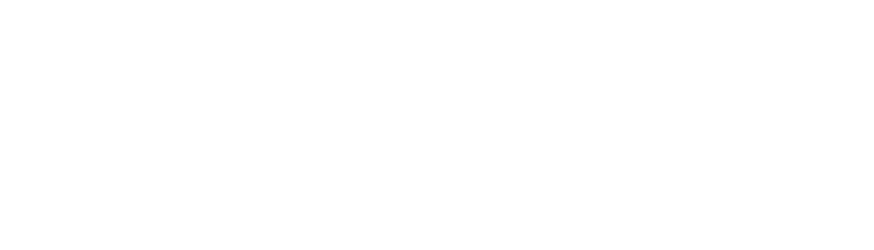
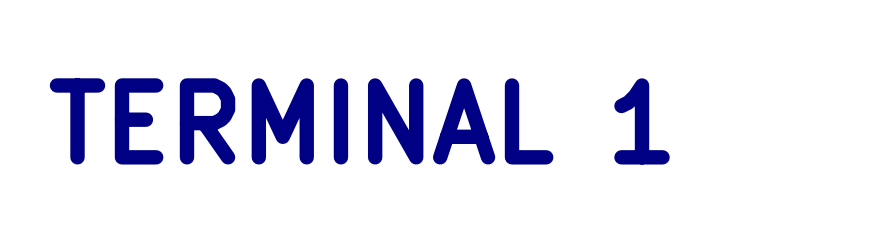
text: none -> TERMINAL 1 (359, 121)

